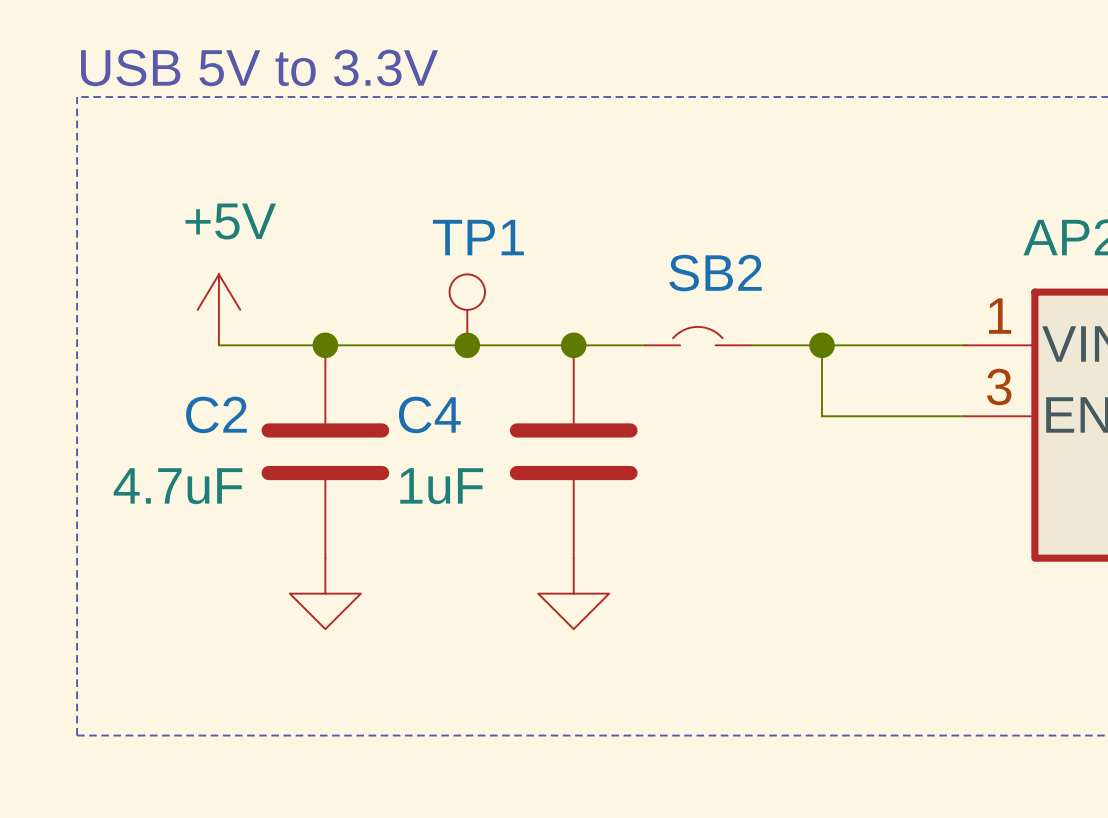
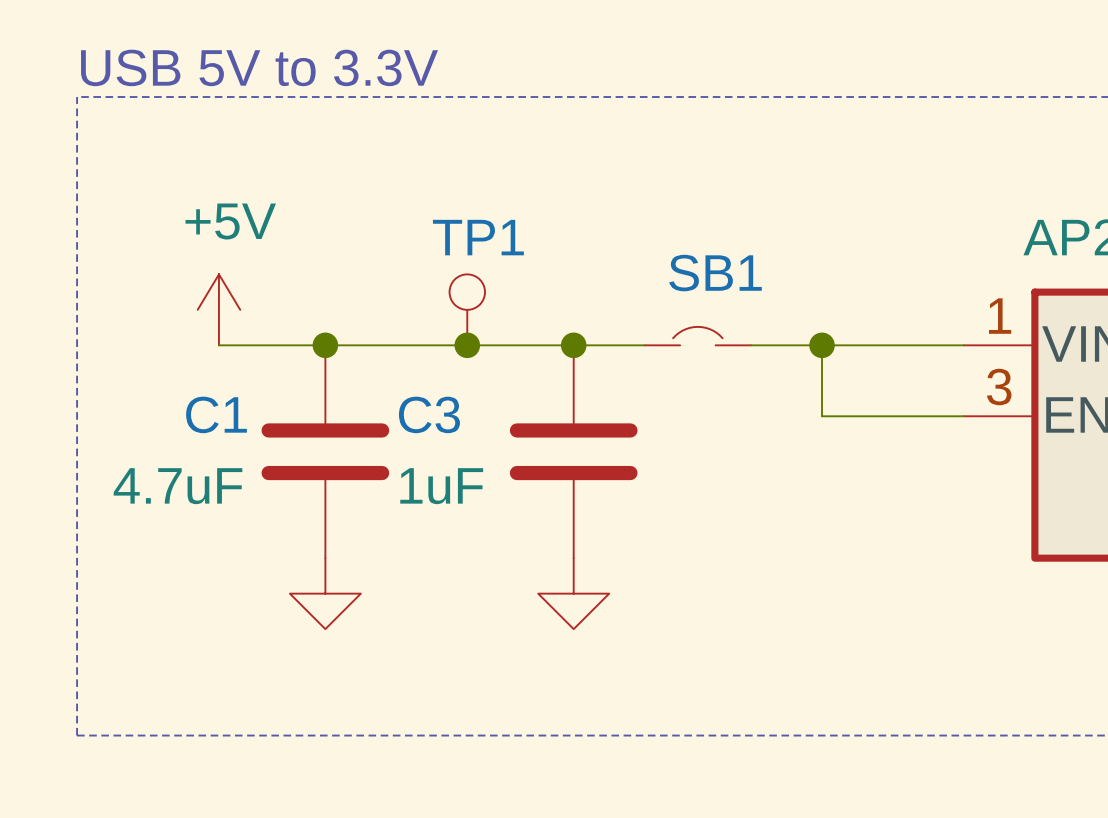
SB2 name: SB2 (715, 273) -> SB1 (715, 273)
C2 name: C2 (216, 414) -> C1 (216, 414)
C4 name: C4 (429, 414) -> C3 (429, 414)

